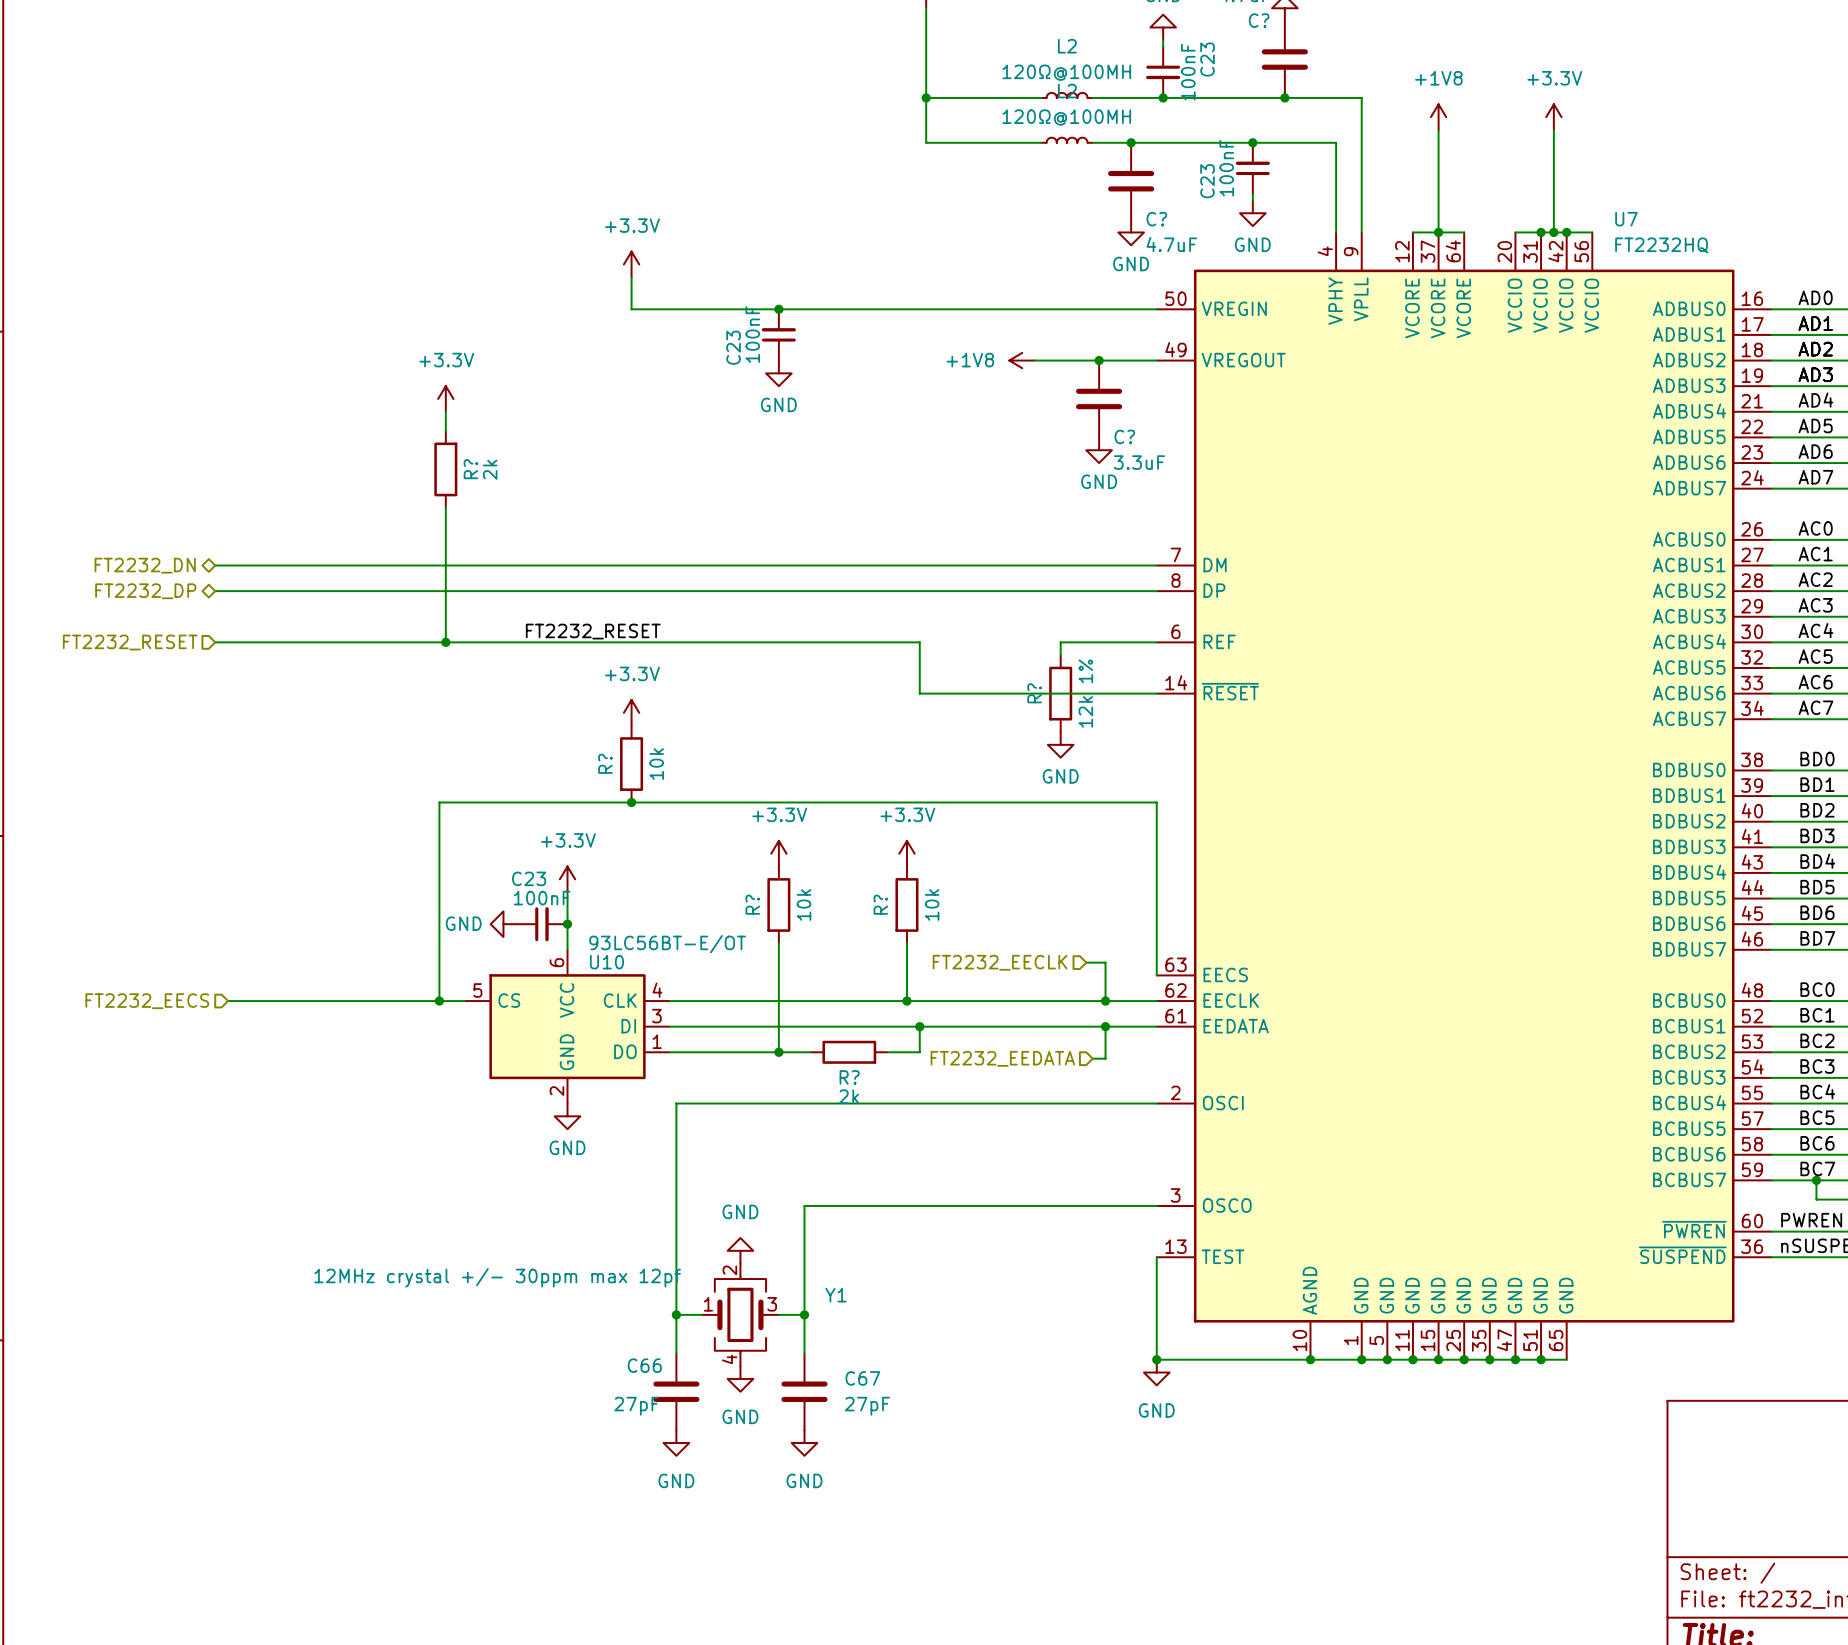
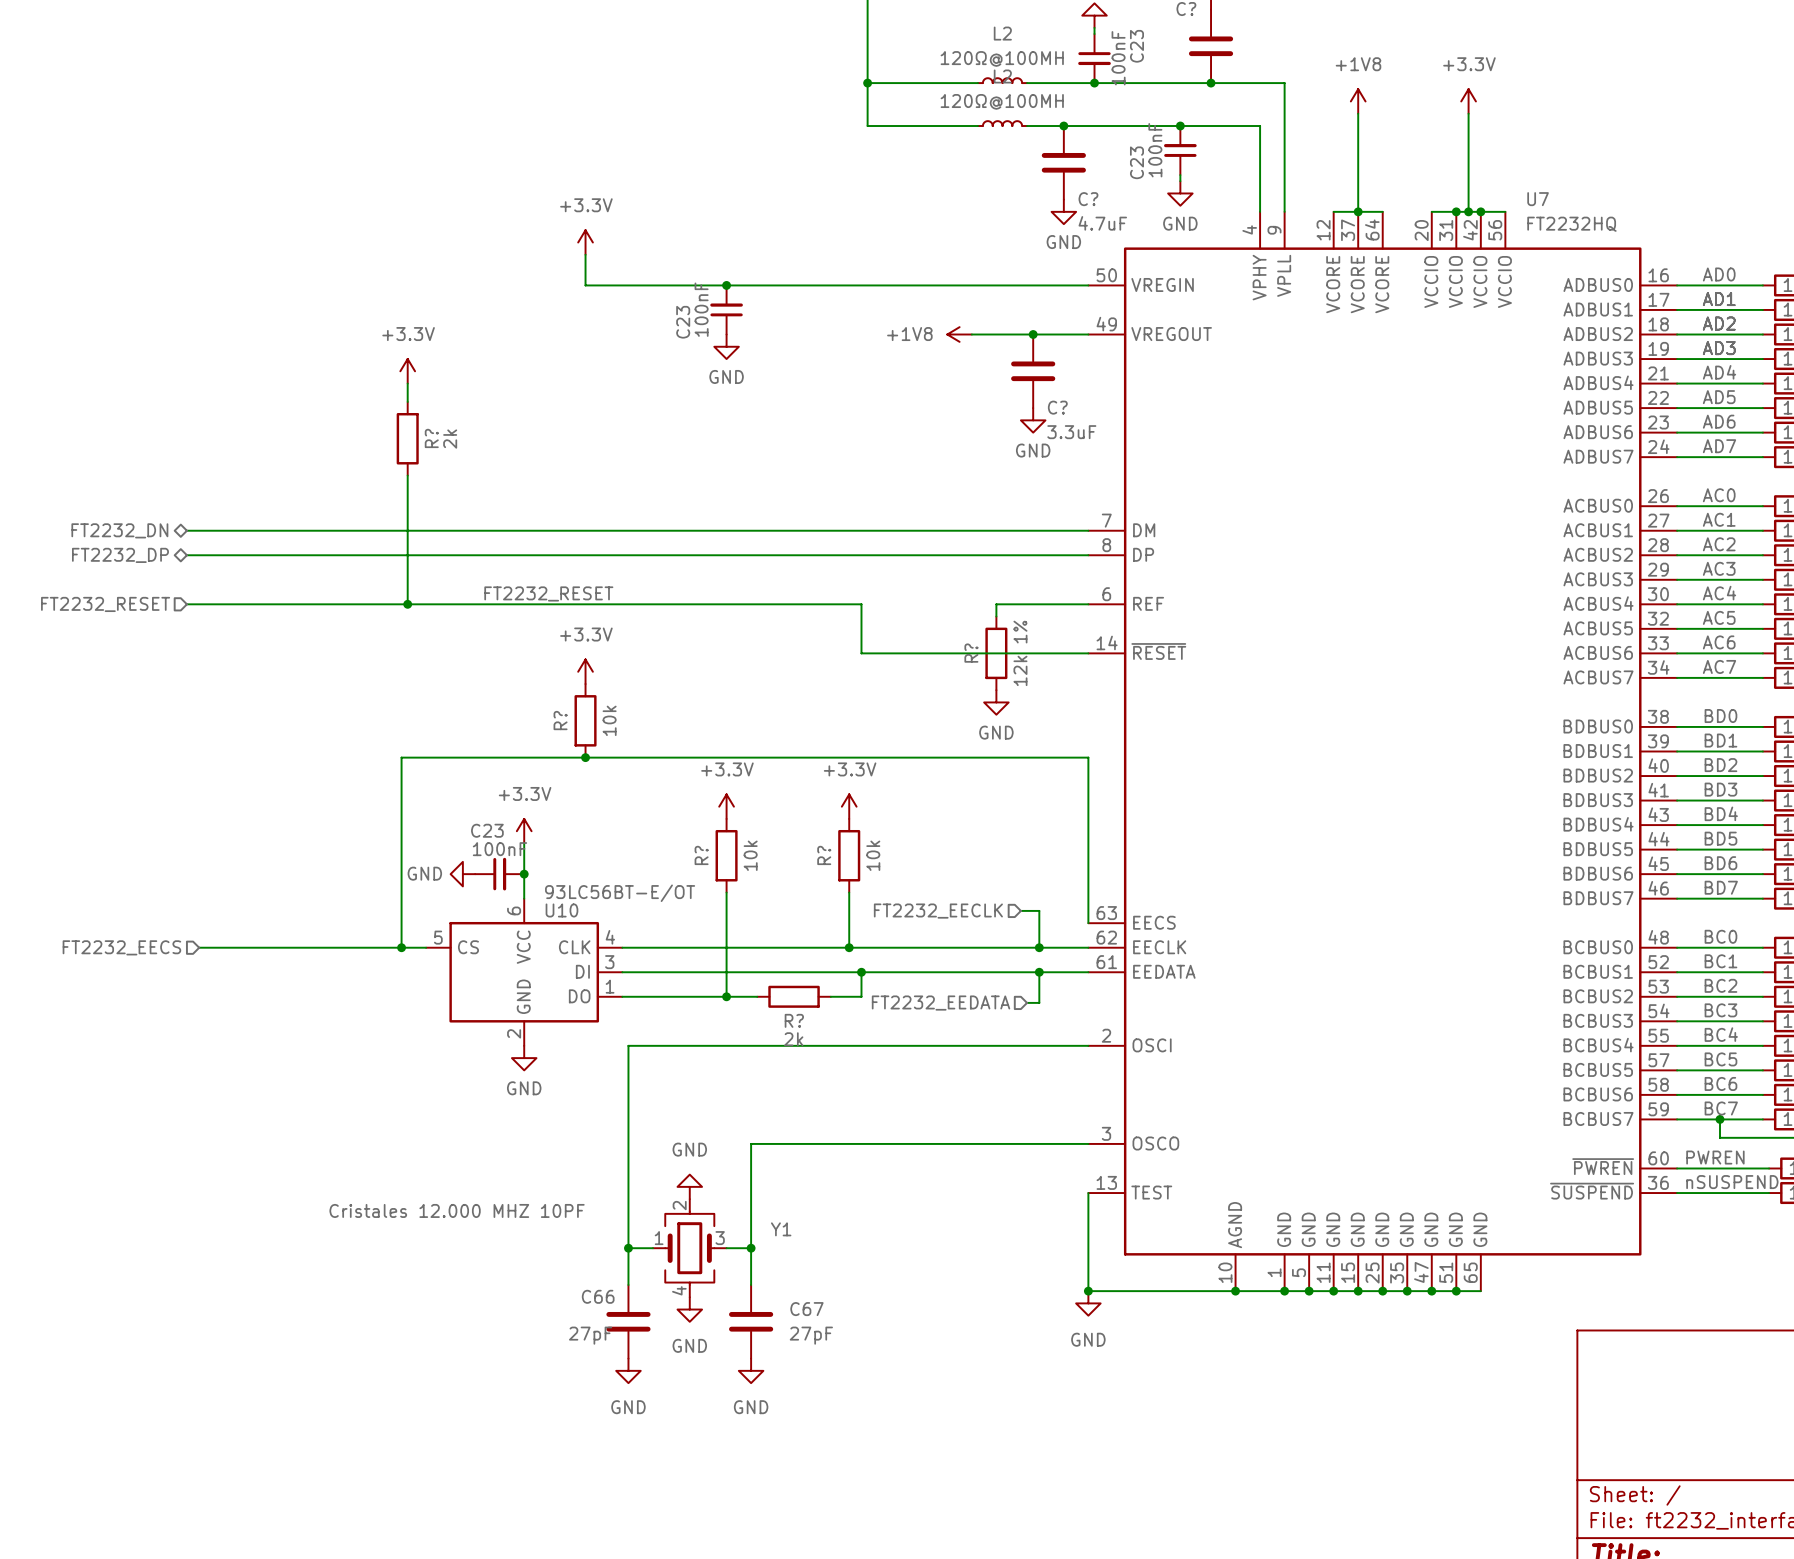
Y1 value: 12MHz crystal +/- 30ppm max 12pf (497, 1277) -> Cristales 12.000 MHZ 10PF (457, 1210)

